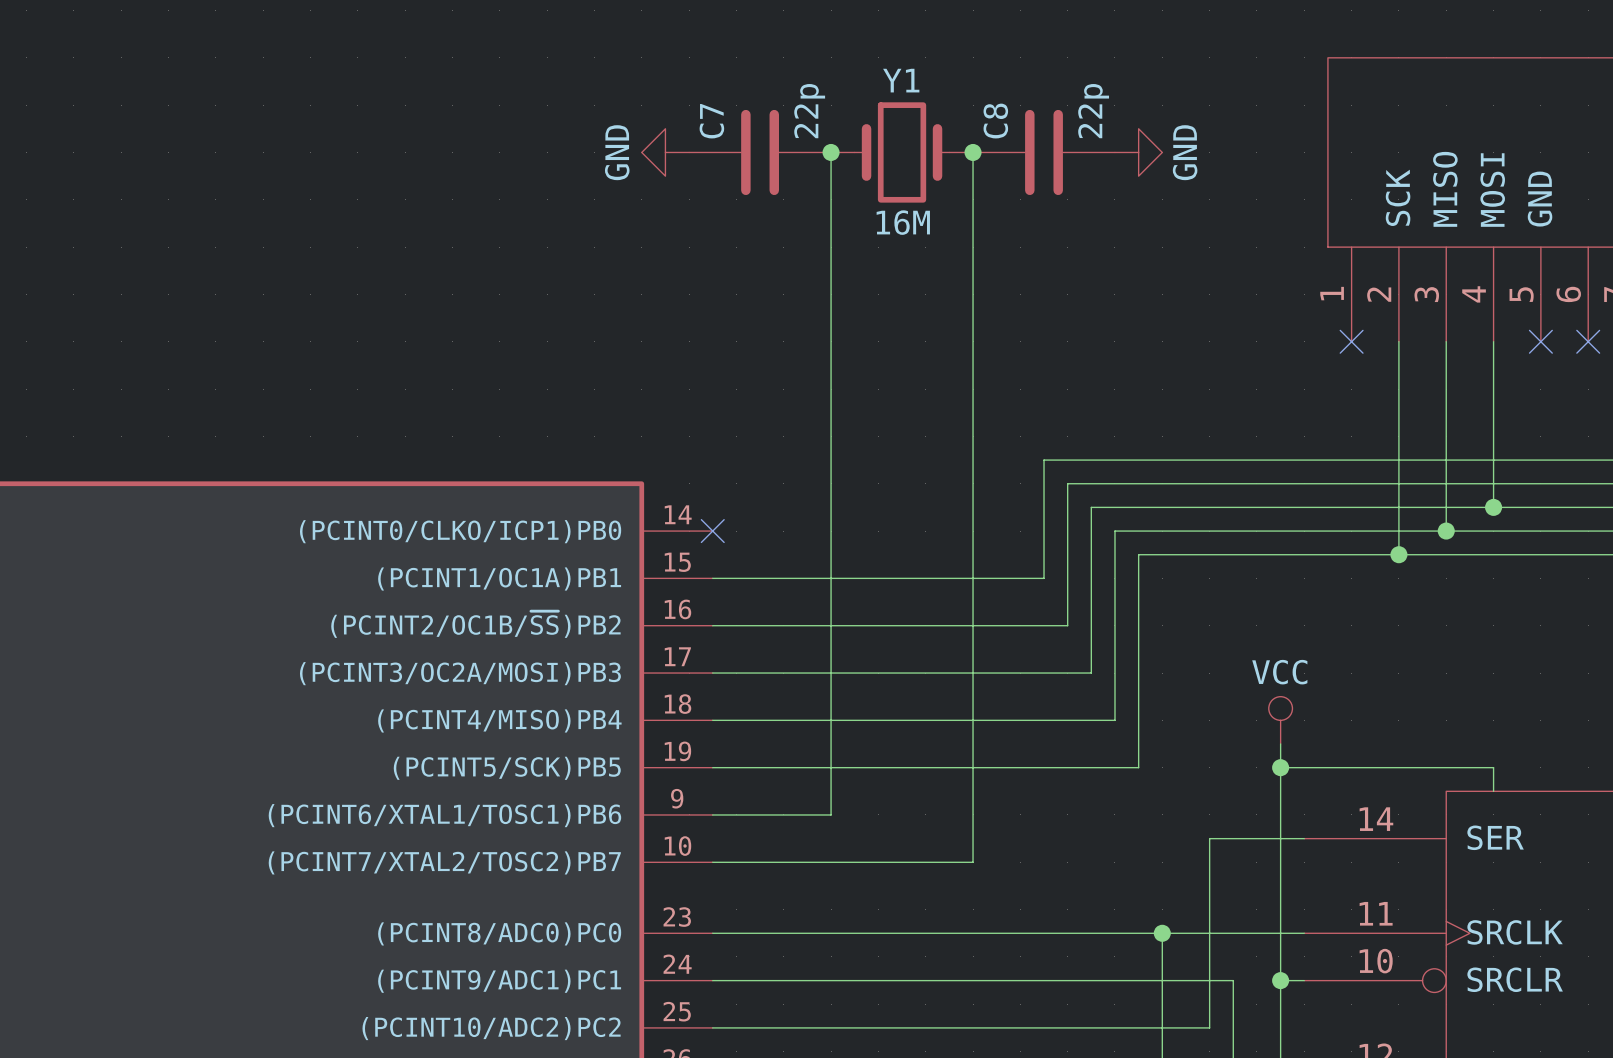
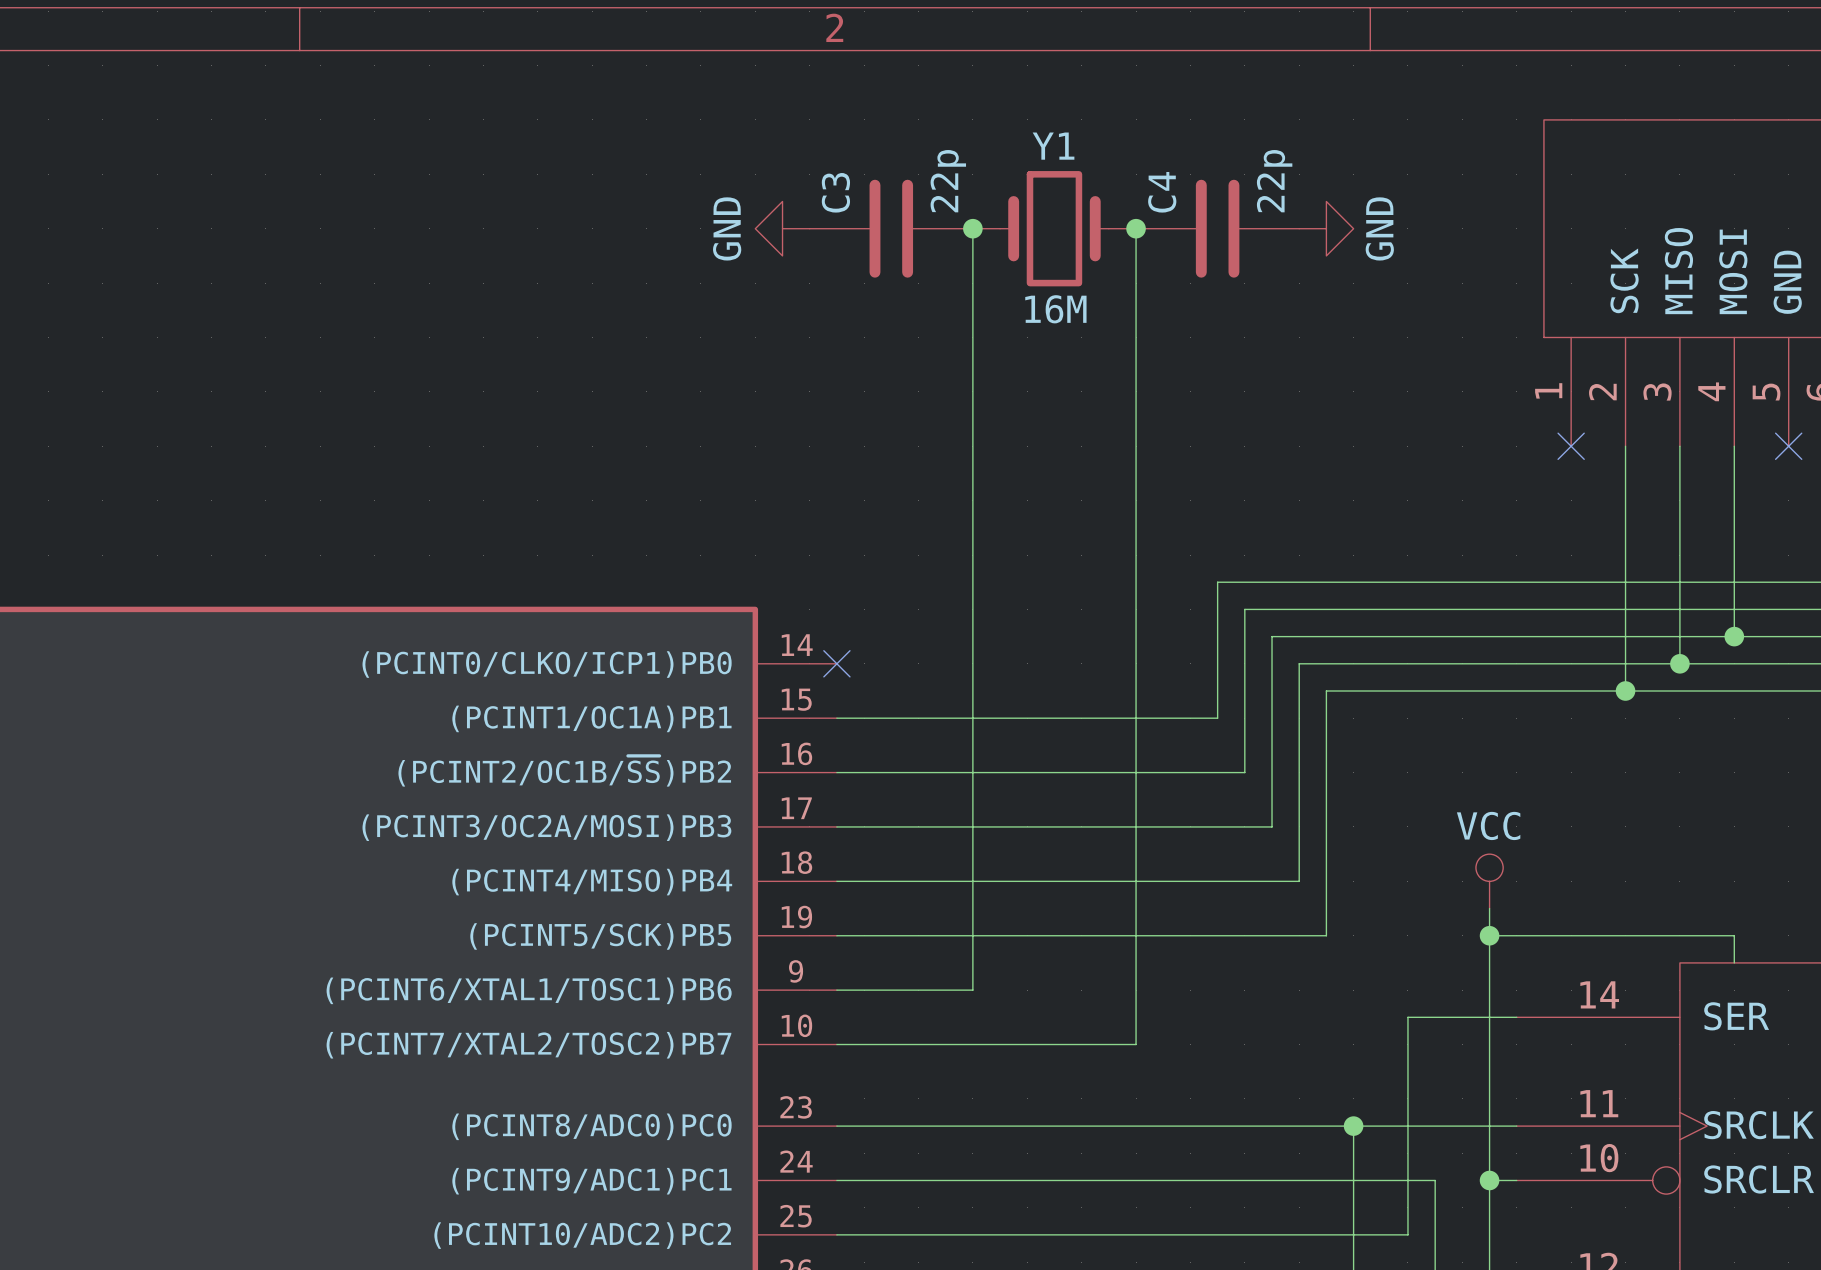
C7 name: C7 (711, 121) -> C3 (835, 192)
C8 name: C8 (995, 121) -> C4 (1162, 192)

